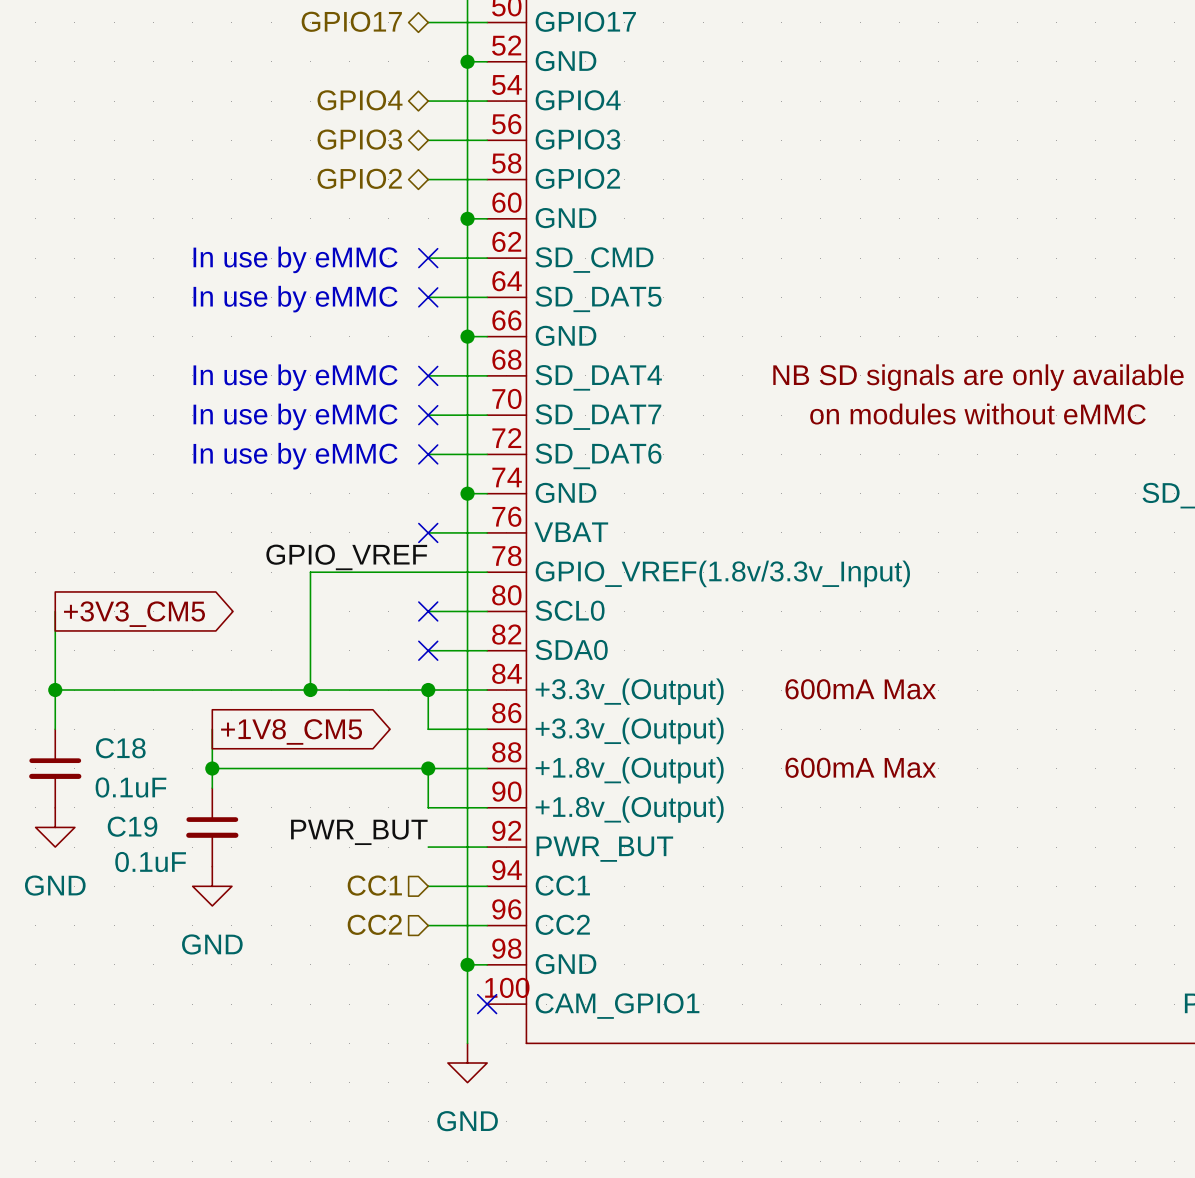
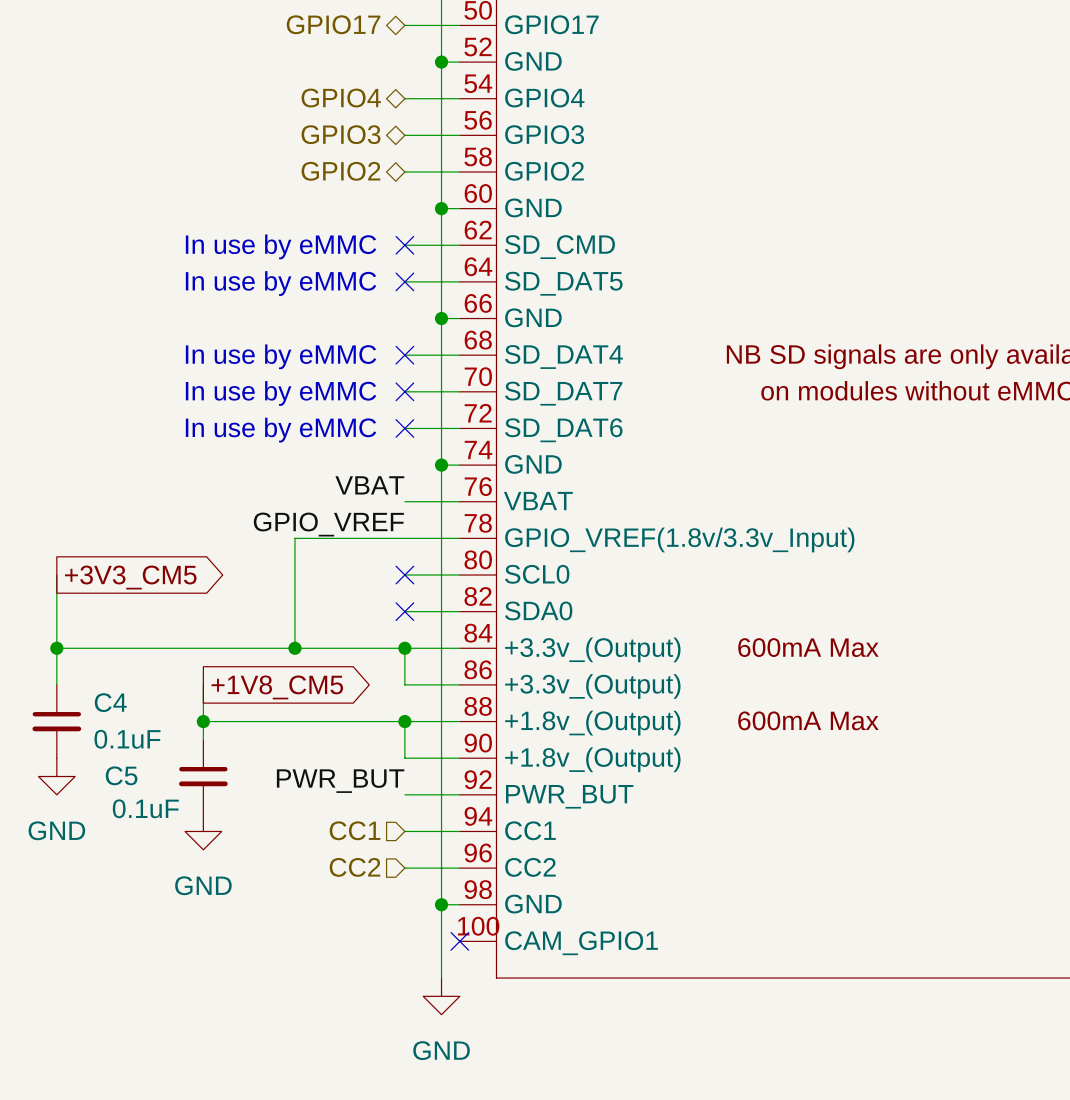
label: none -> VBAT (369, 485)
no-connect mark: (428, 532) -> none
C18 name: C18 (120, 748) -> C4 (110, 702)
C19 name: C19 (132, 826) -> C5 (121, 775)

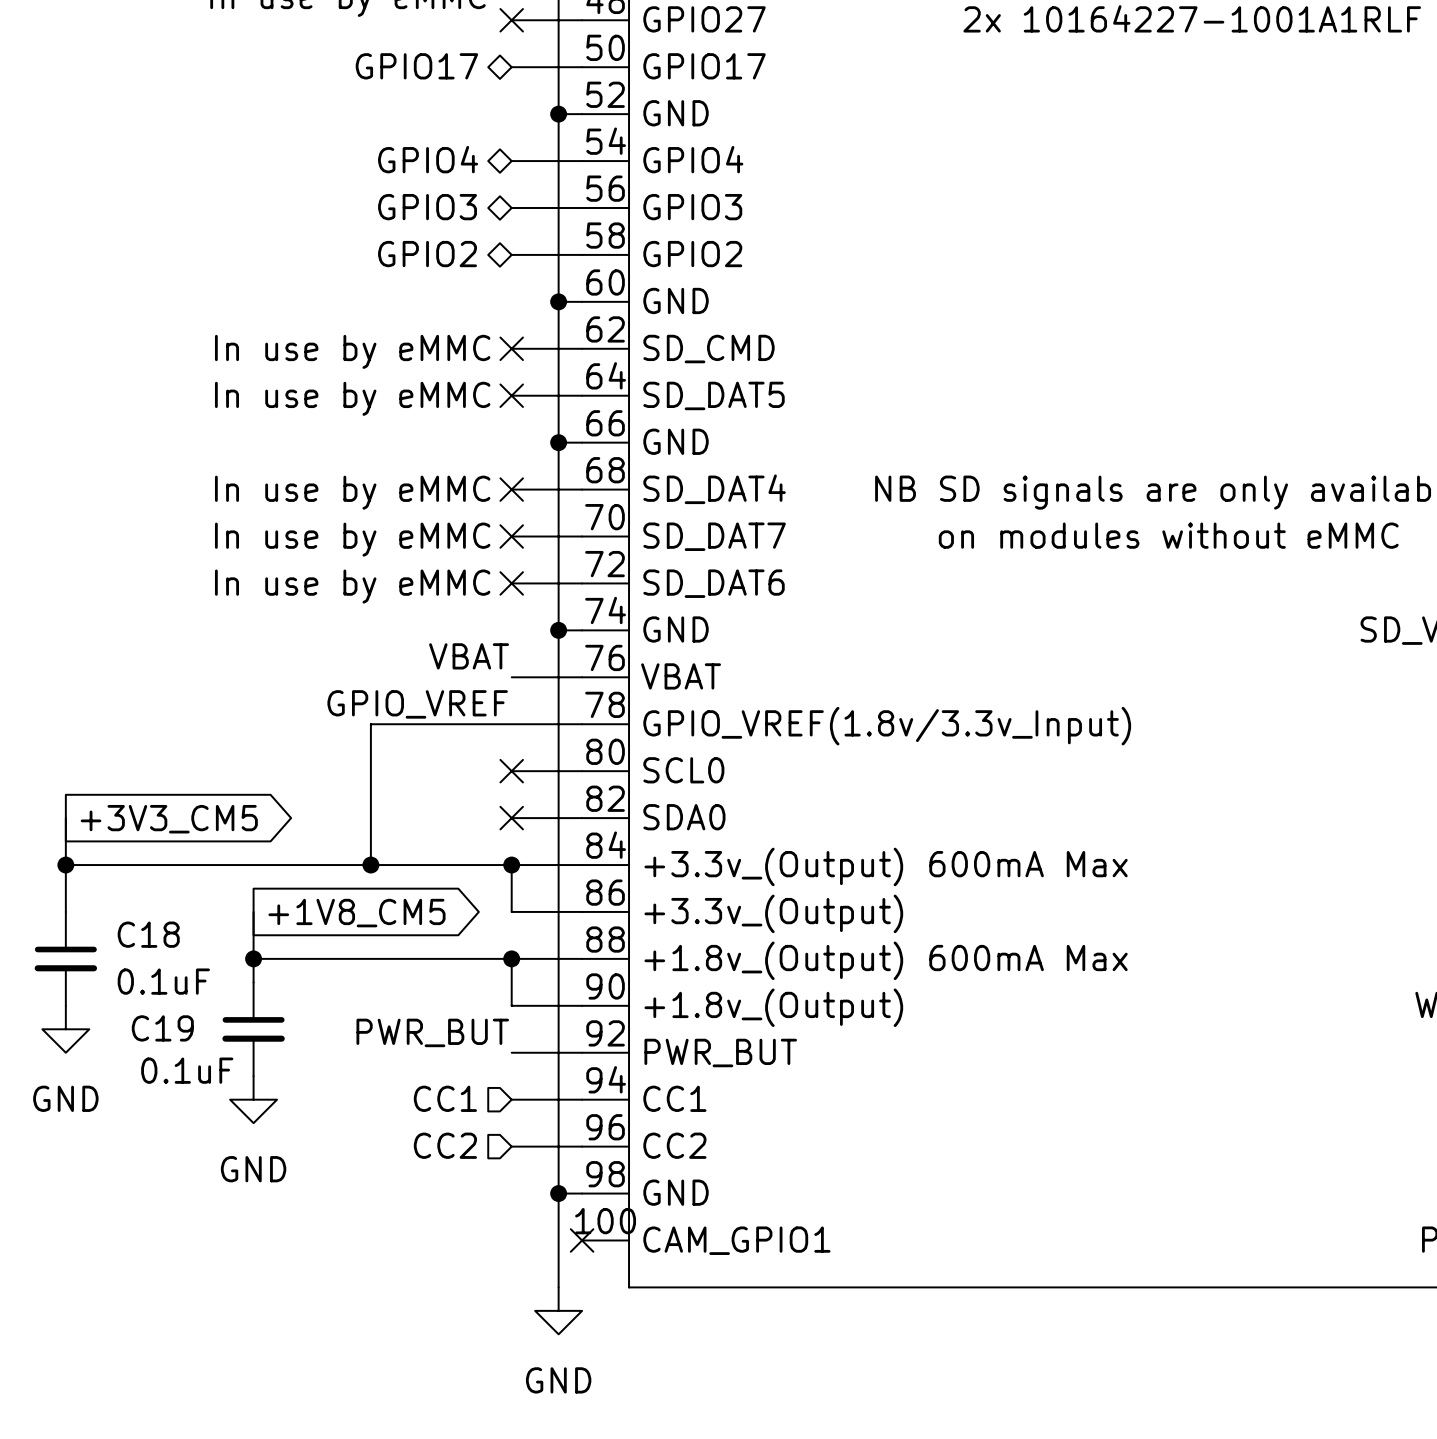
global label position: +3V3_CM5 (130, 577) -> +3V3_CM5 (169, 819)
C4 name: C4 (110, 702) -> C18 (148, 934)
C5 name: C5 (121, 775) -> C19 (162, 1028)

